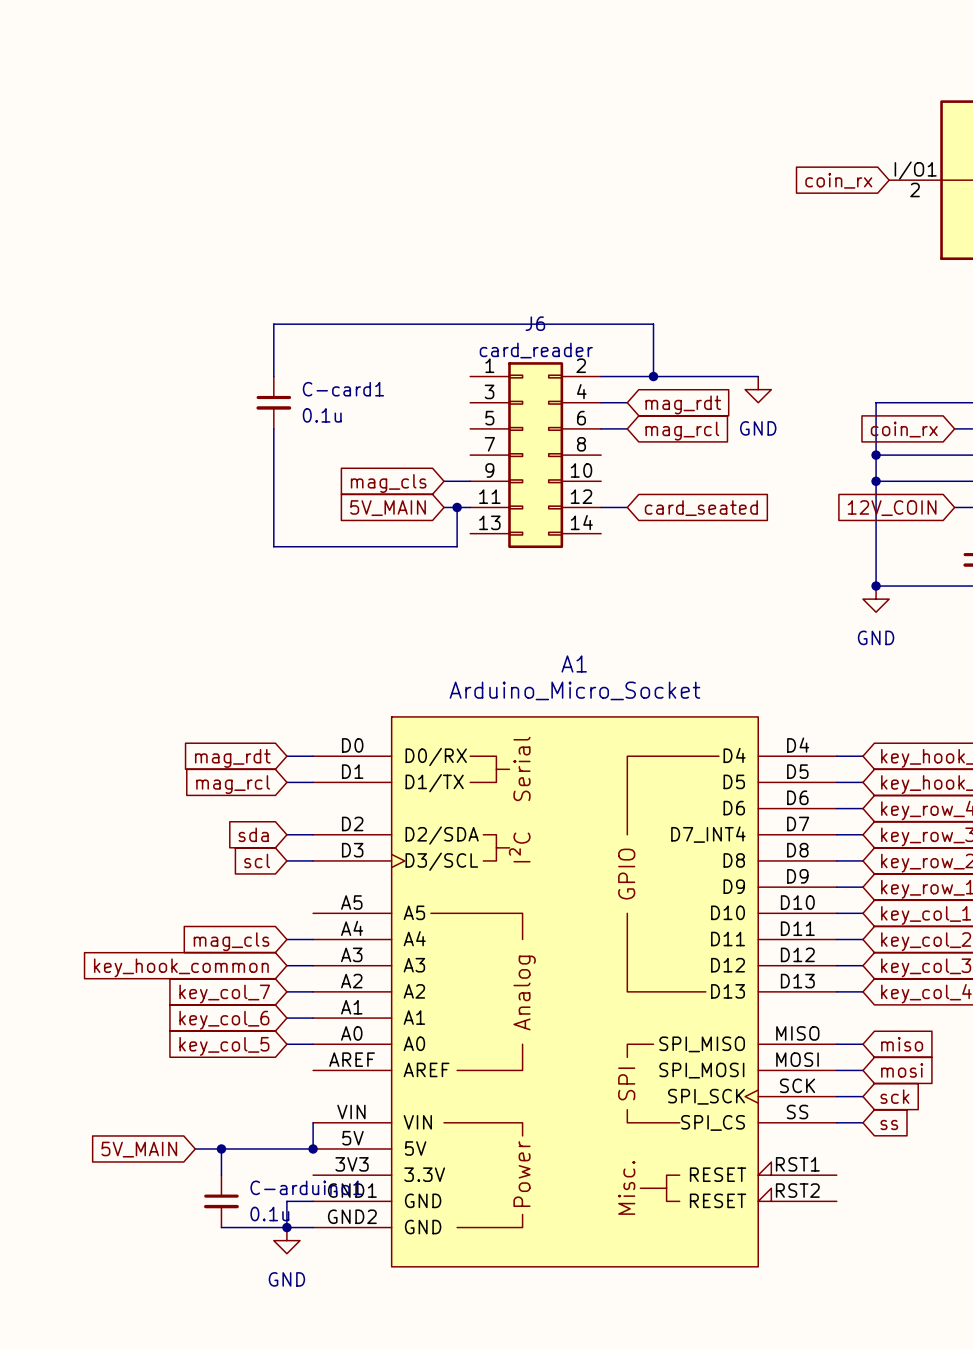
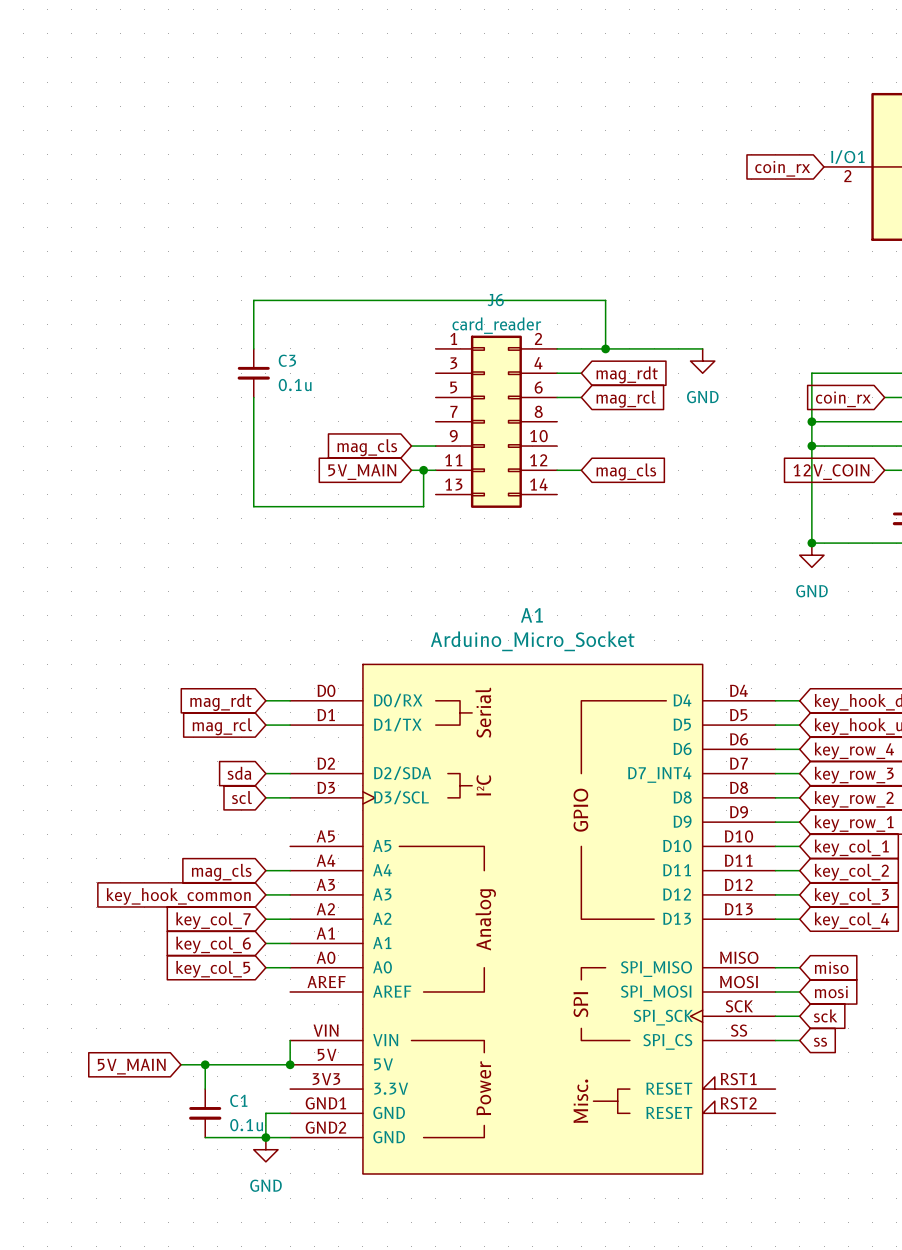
C-card1 name: C-card1 (343, 389) -> C3 (287, 360)
global label: card_seated (701, 508) -> mag_cls (626, 471)
C-arduino1 name: C-arduino1 (306, 1187) -> C1 (238, 1100)

